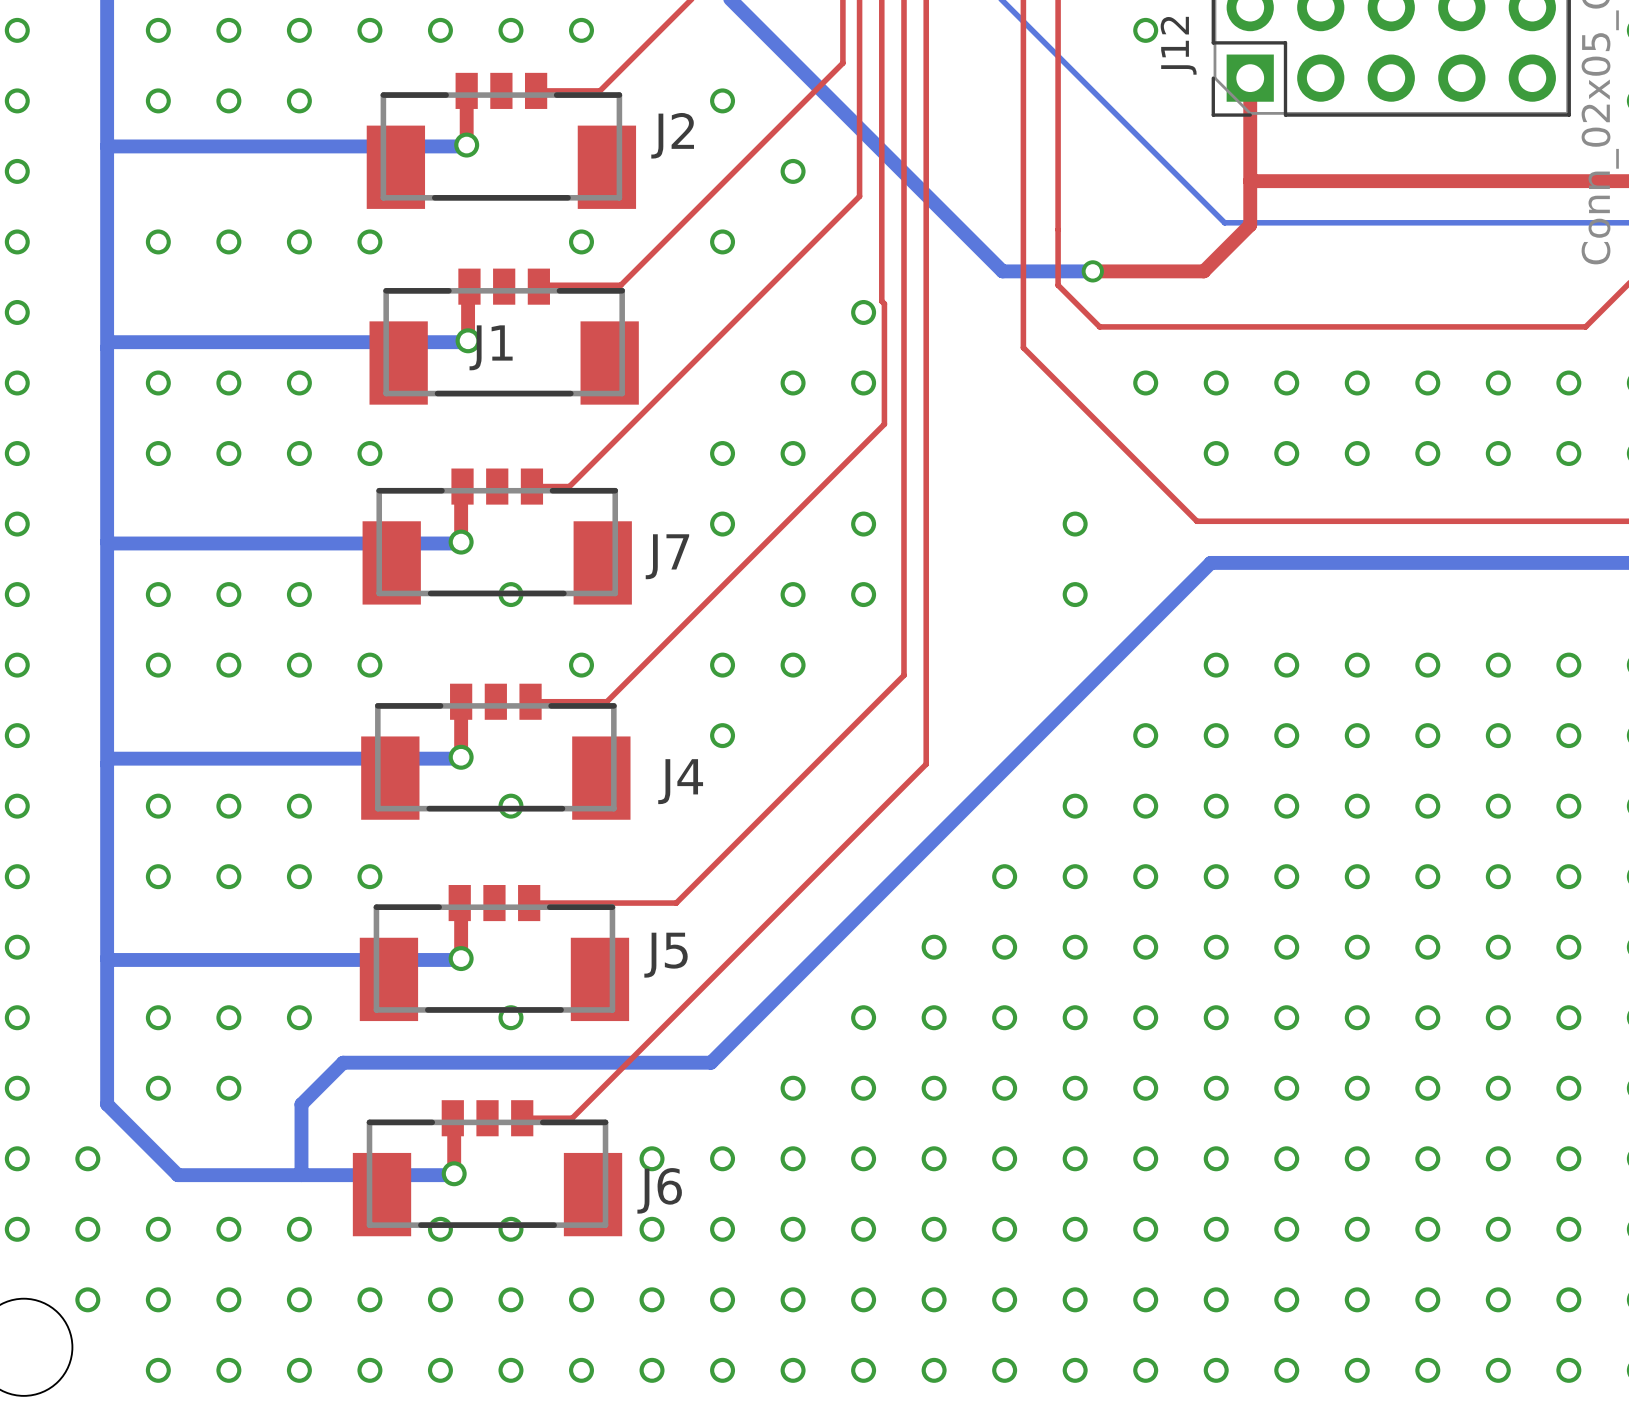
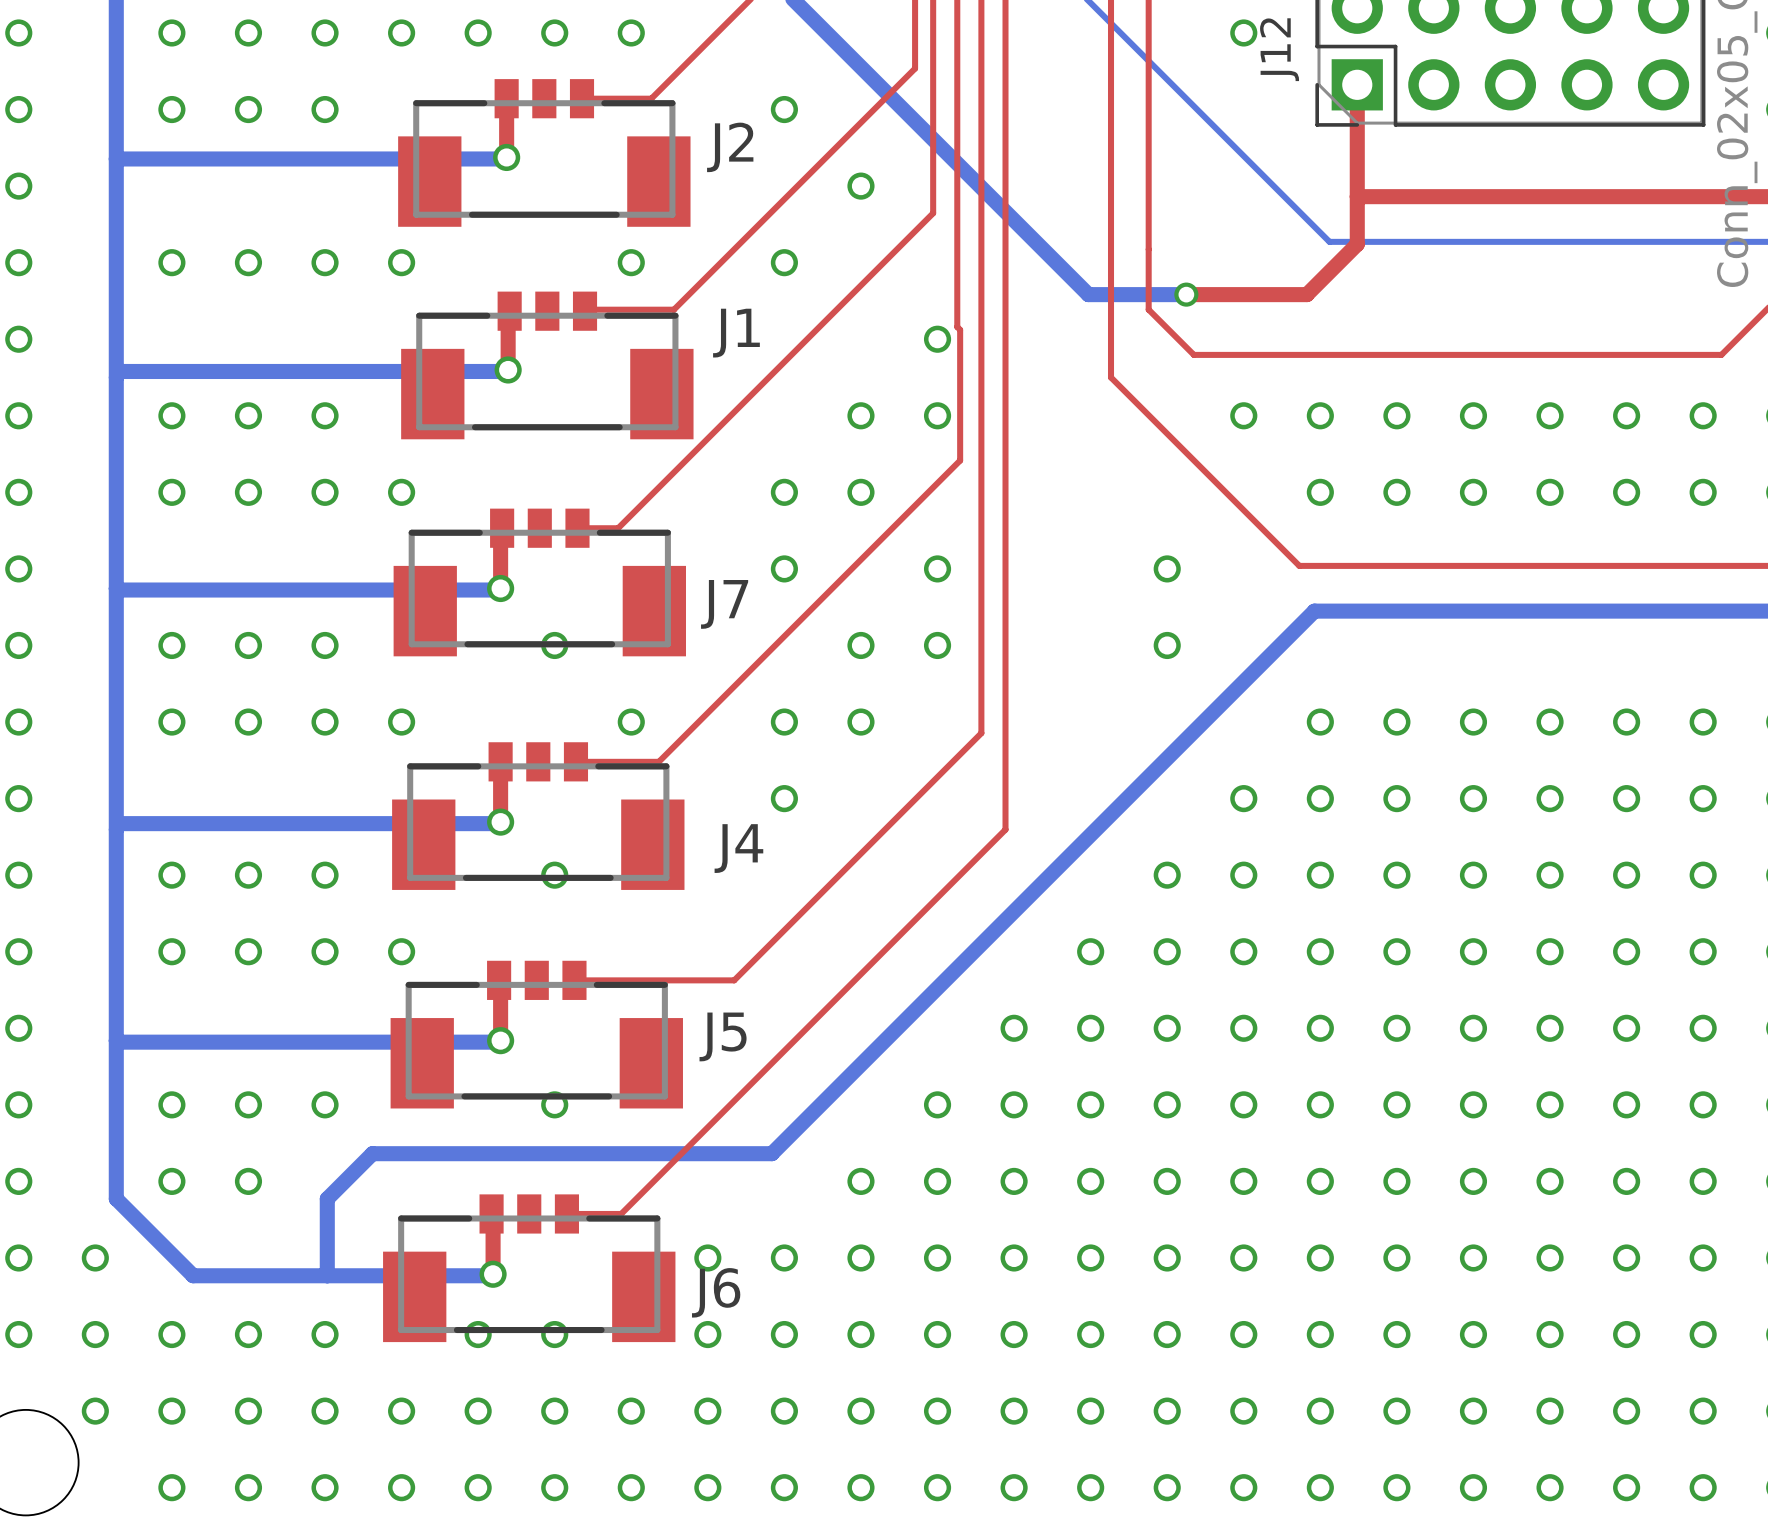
J1 name position: J1 (491, 347) -> J1 (736, 333)

